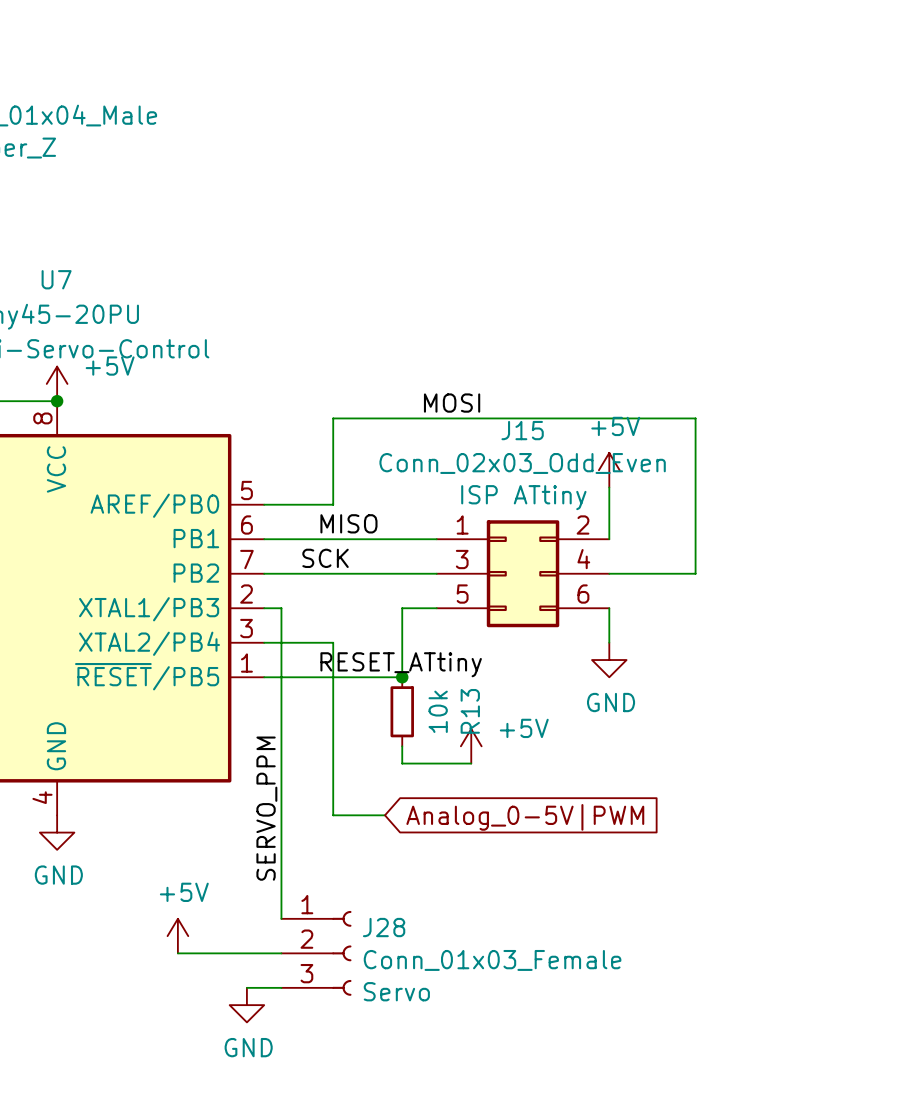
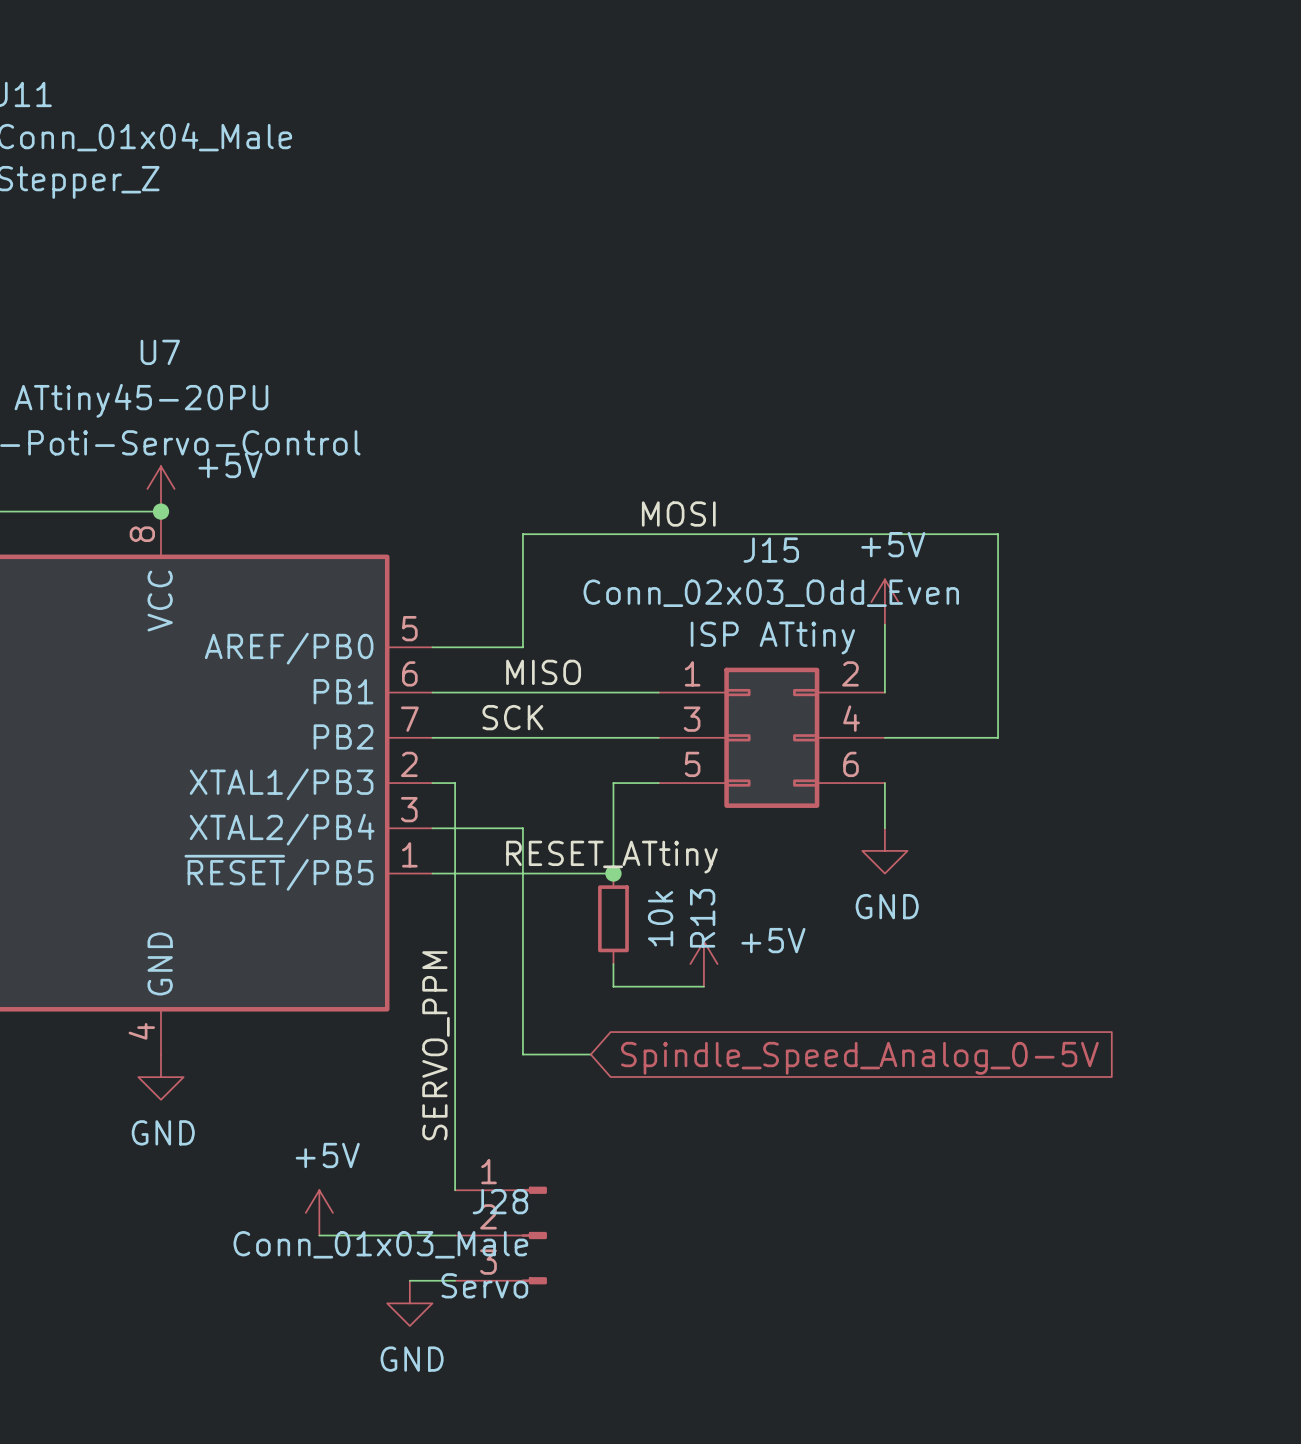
global label: Analog_0-5V|PWM (525, 817) -> Spindle_Speed_Analog_0-5V (859, 1058)
J28 symbol: [281, 910, 352, 996] -> [455, 1186, 547, 1285]
J28 name position: J28 (384, 927) -> J28 (500, 1201)
J28 value: Conn_01x03_Female (492, 960) -> Conn_01x03_Male (380, 1244)
J28 text position: Servo (396, 991) -> Servo (484, 1285)

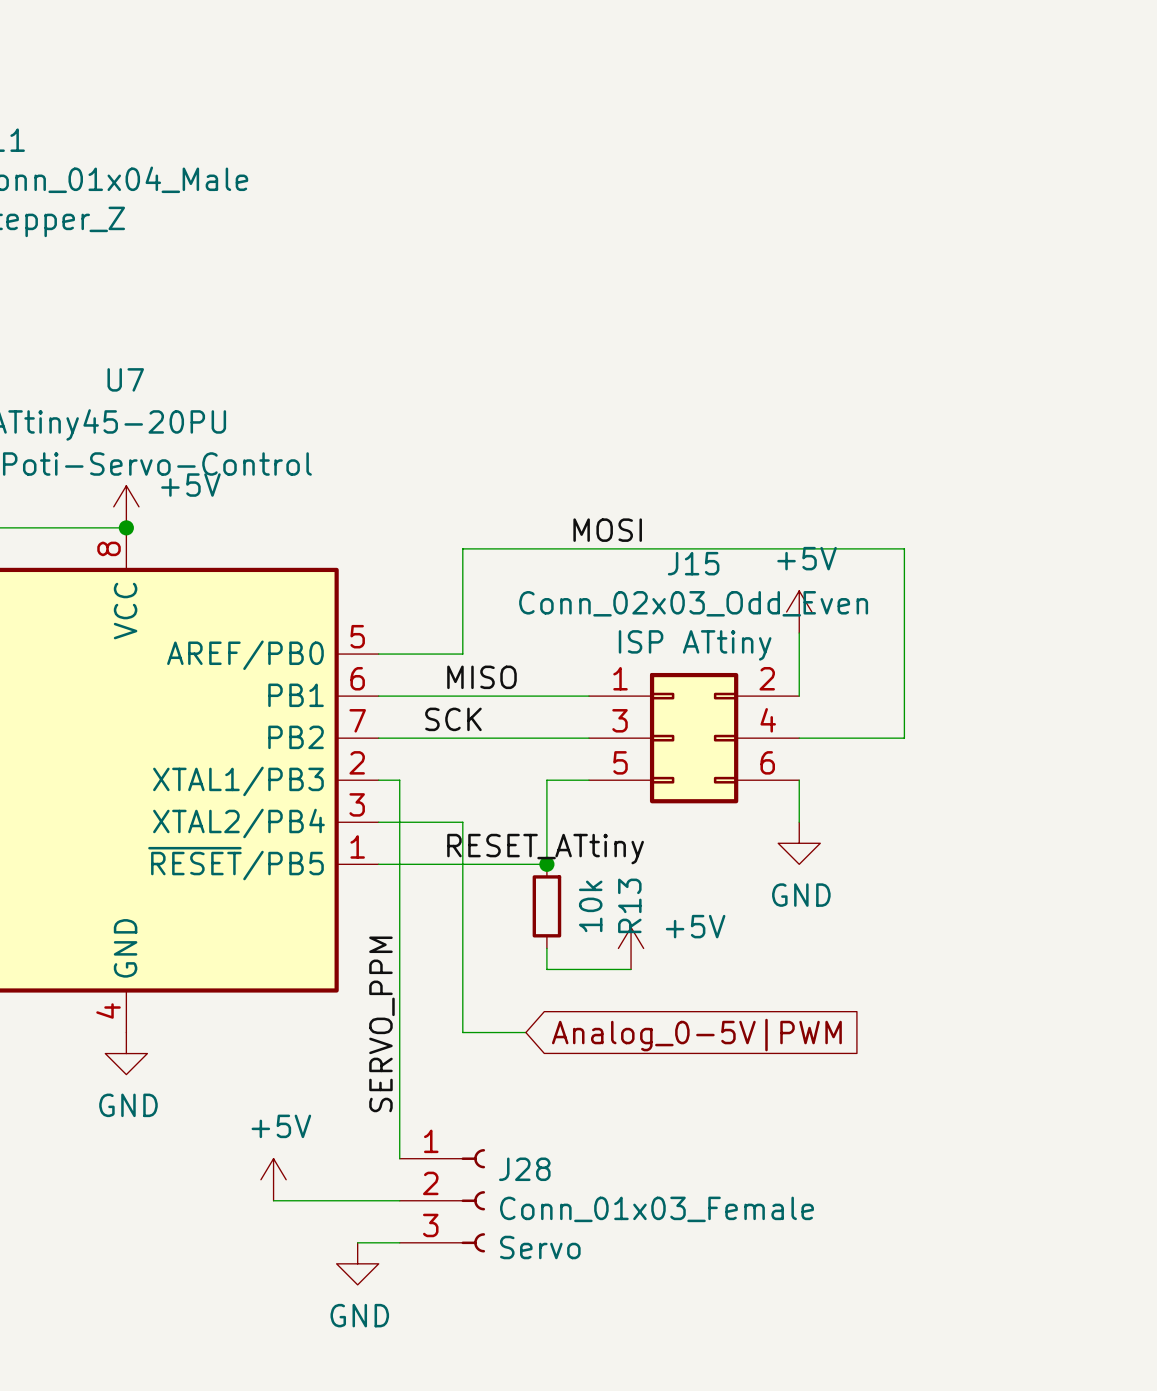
global label: Spindle_Speed_Analog_0-5V (859, 1058) -> Analog_0-5V|PWM (696, 1035)
J28 symbol: [455, 1186, 547, 1285] -> [399, 1149, 486, 1253]
J28 name position: J28 (500, 1201) -> J28 (524, 1169)
J28 value: Conn_01x03_Male (380, 1244) -> Conn_01x03_Female (656, 1209)
J28 text position: Servo (484, 1285) -> Servo (540, 1247)

